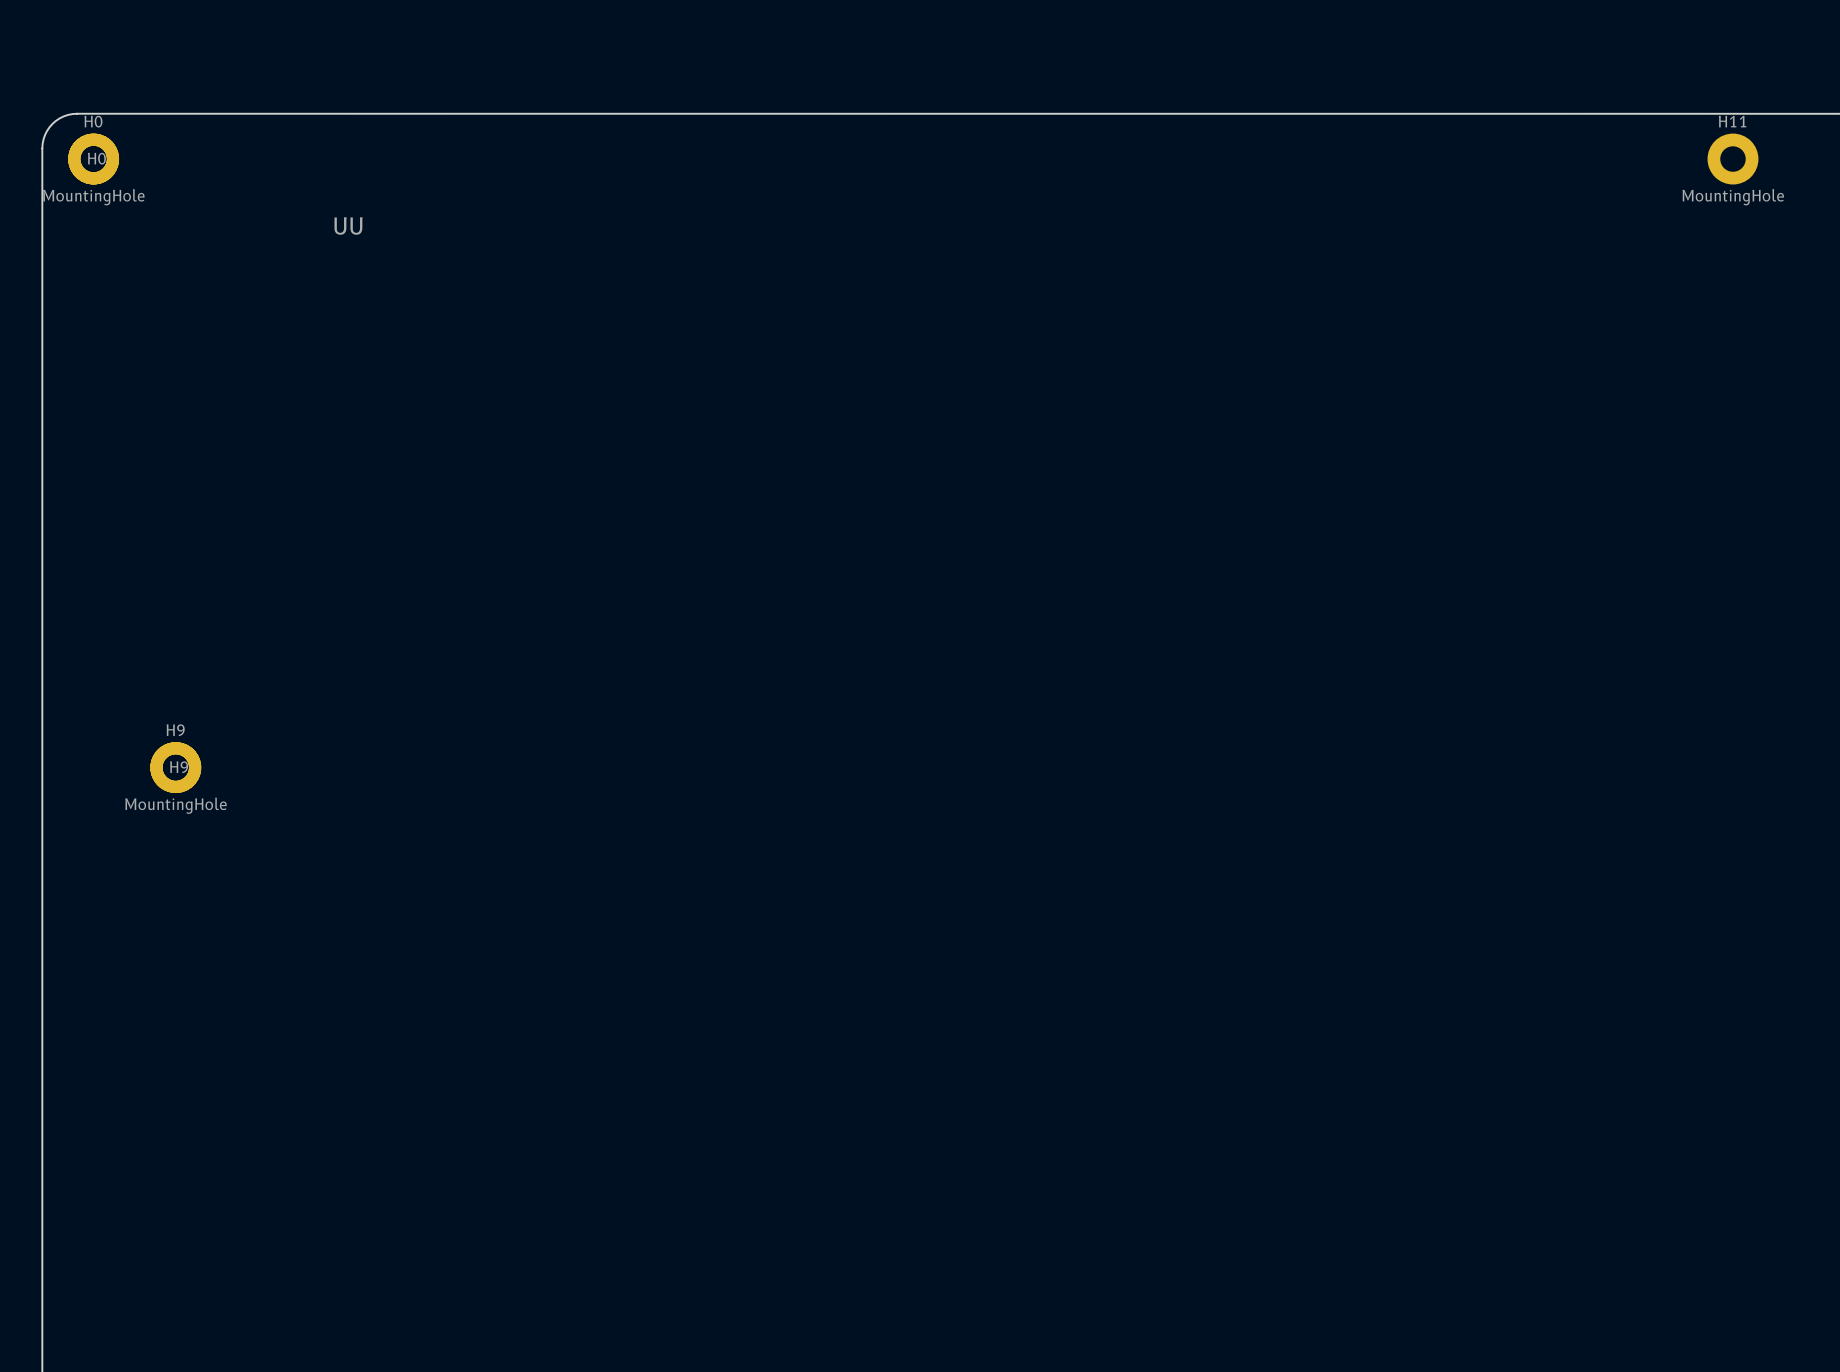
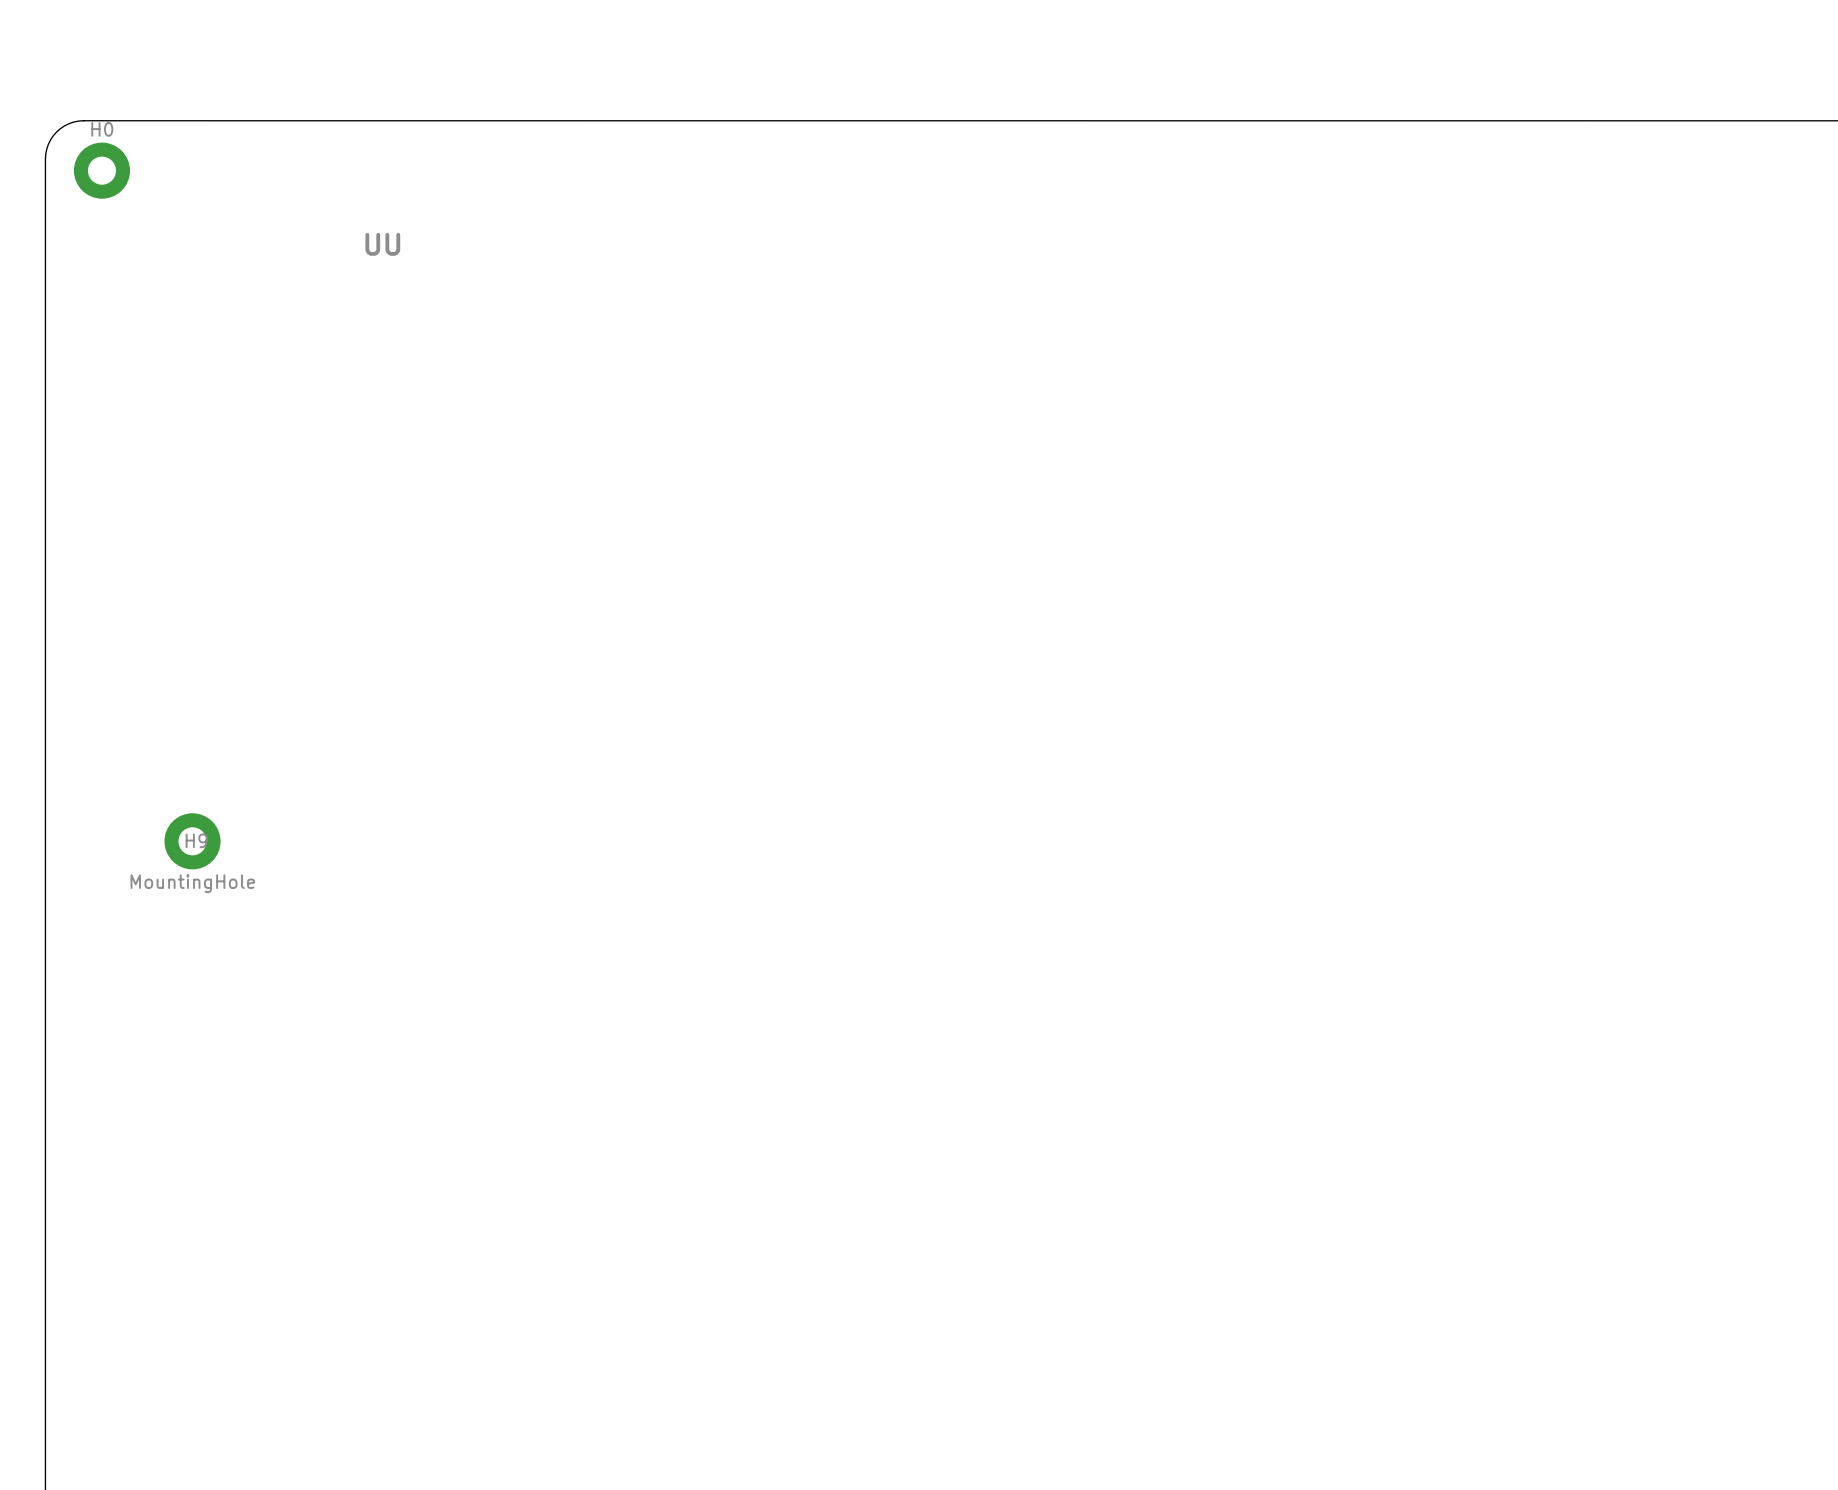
H0: MountingHole (93, 159) -> none
H9: (175, 767) -> none

